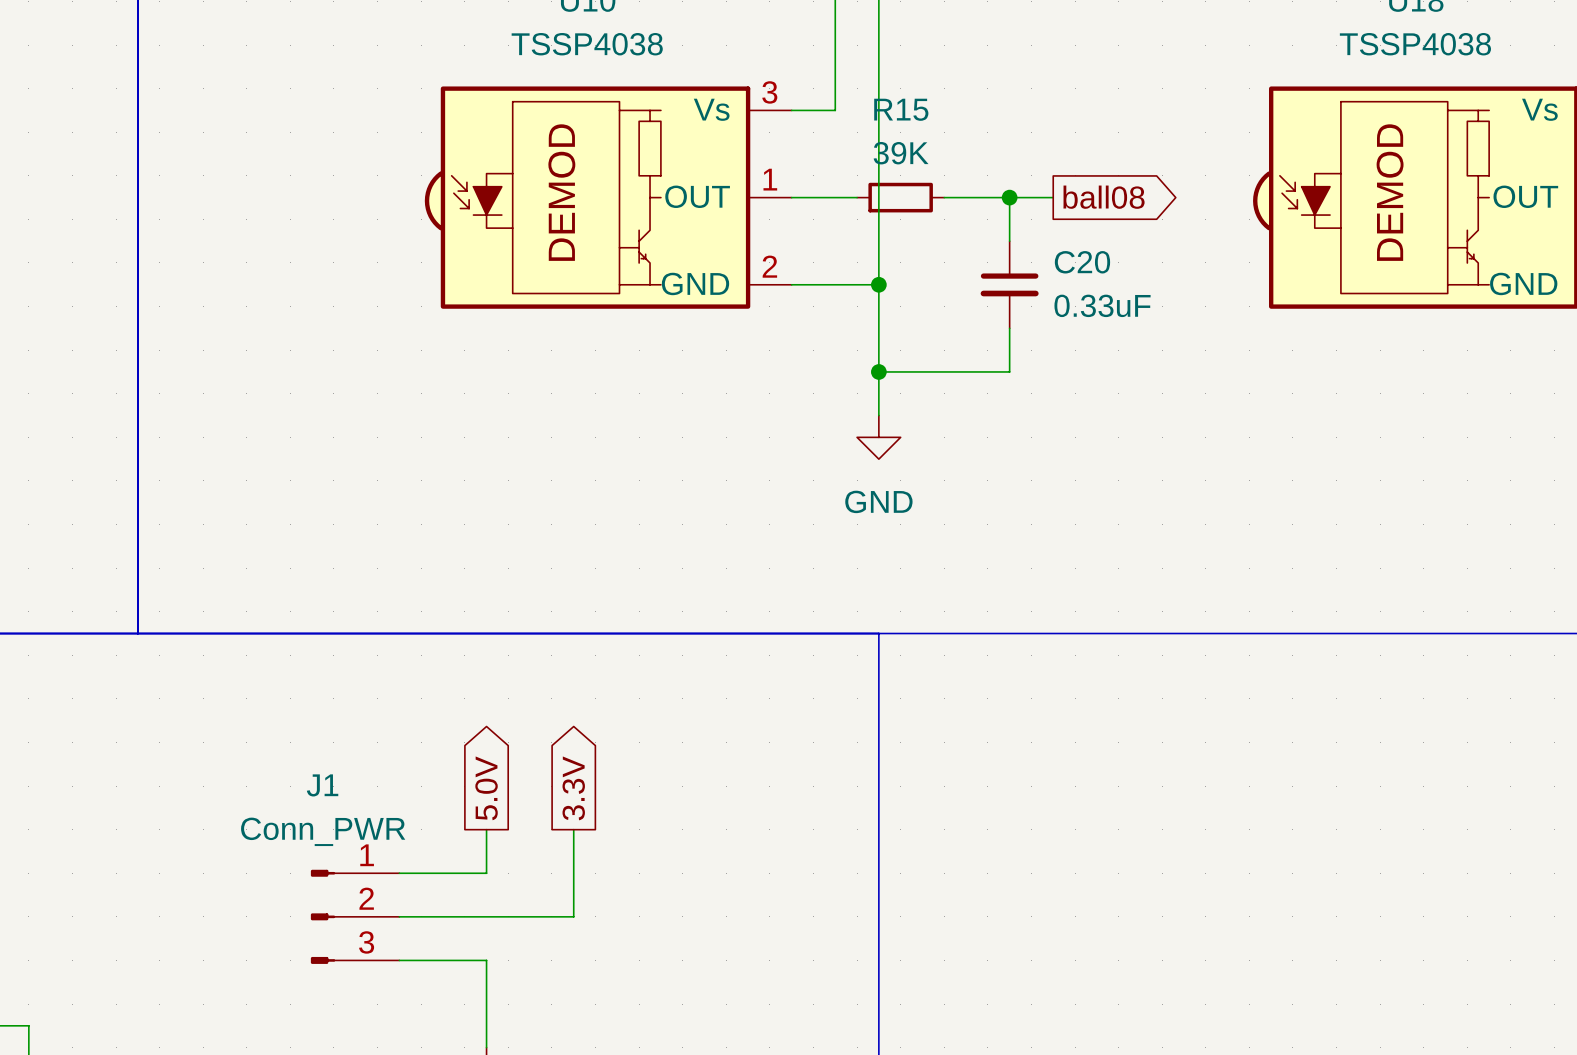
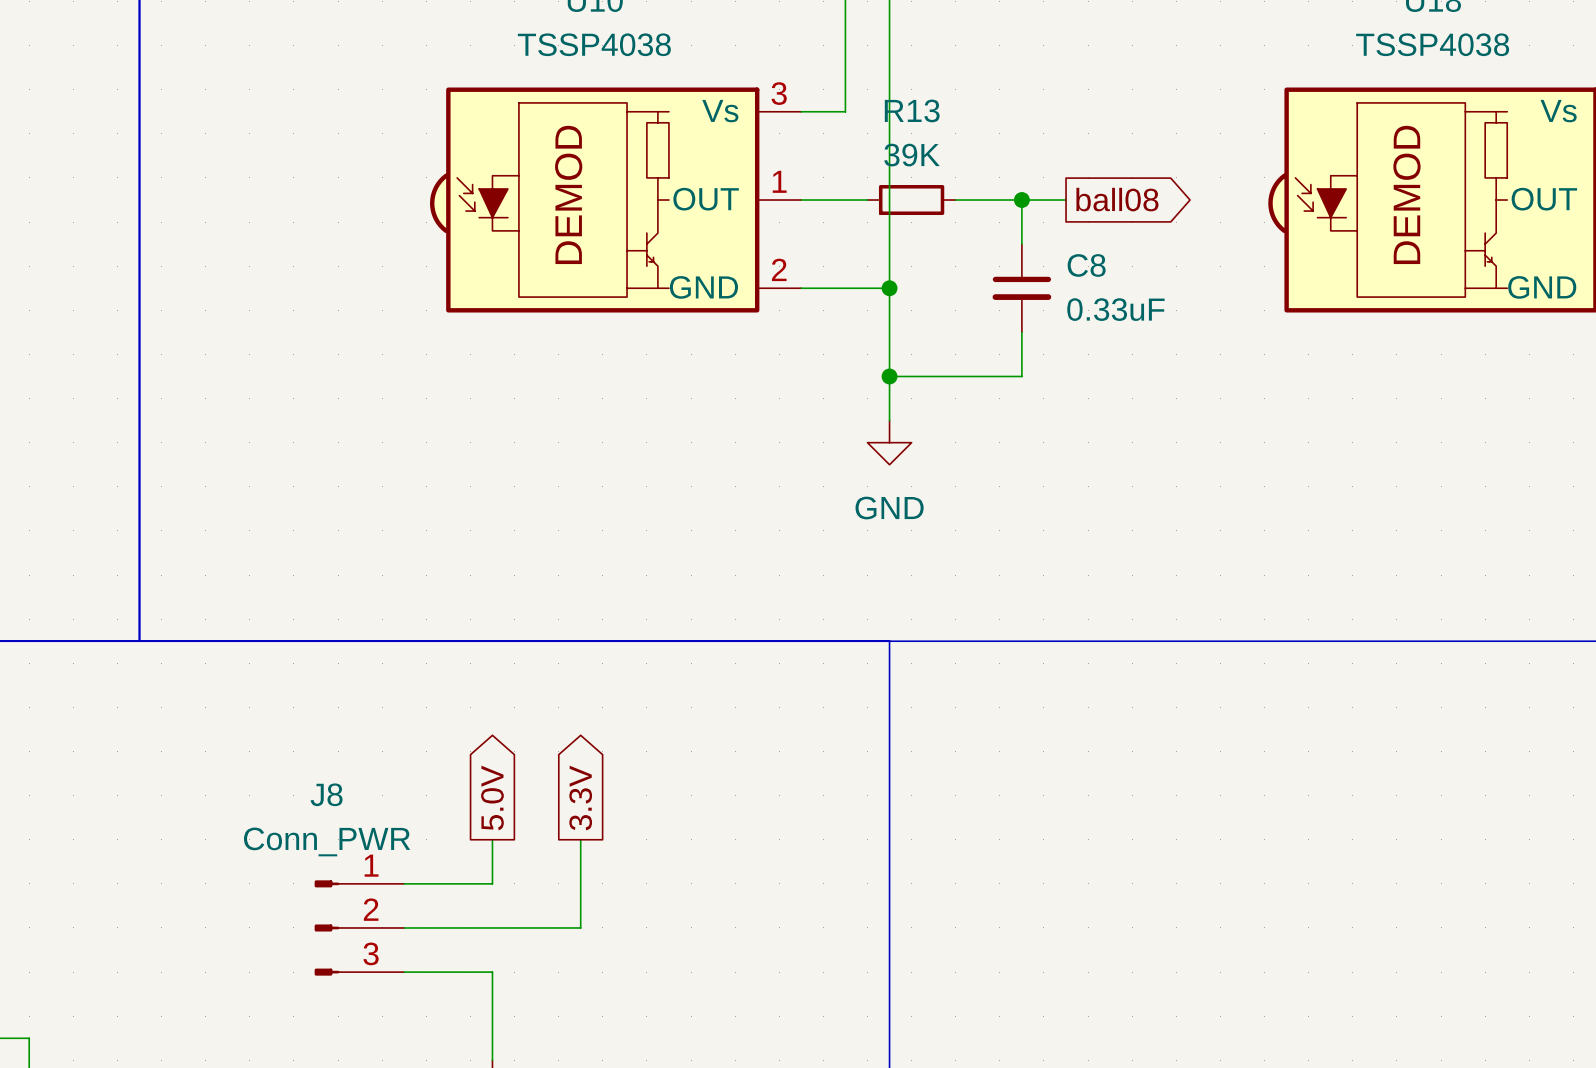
R15 name: R15 (901, 109) -> R13 (912, 110)
C20 name: C20 (1082, 262) -> C8 (1086, 265)
J1 name: J1 (322, 785) -> J8 (326, 794)

